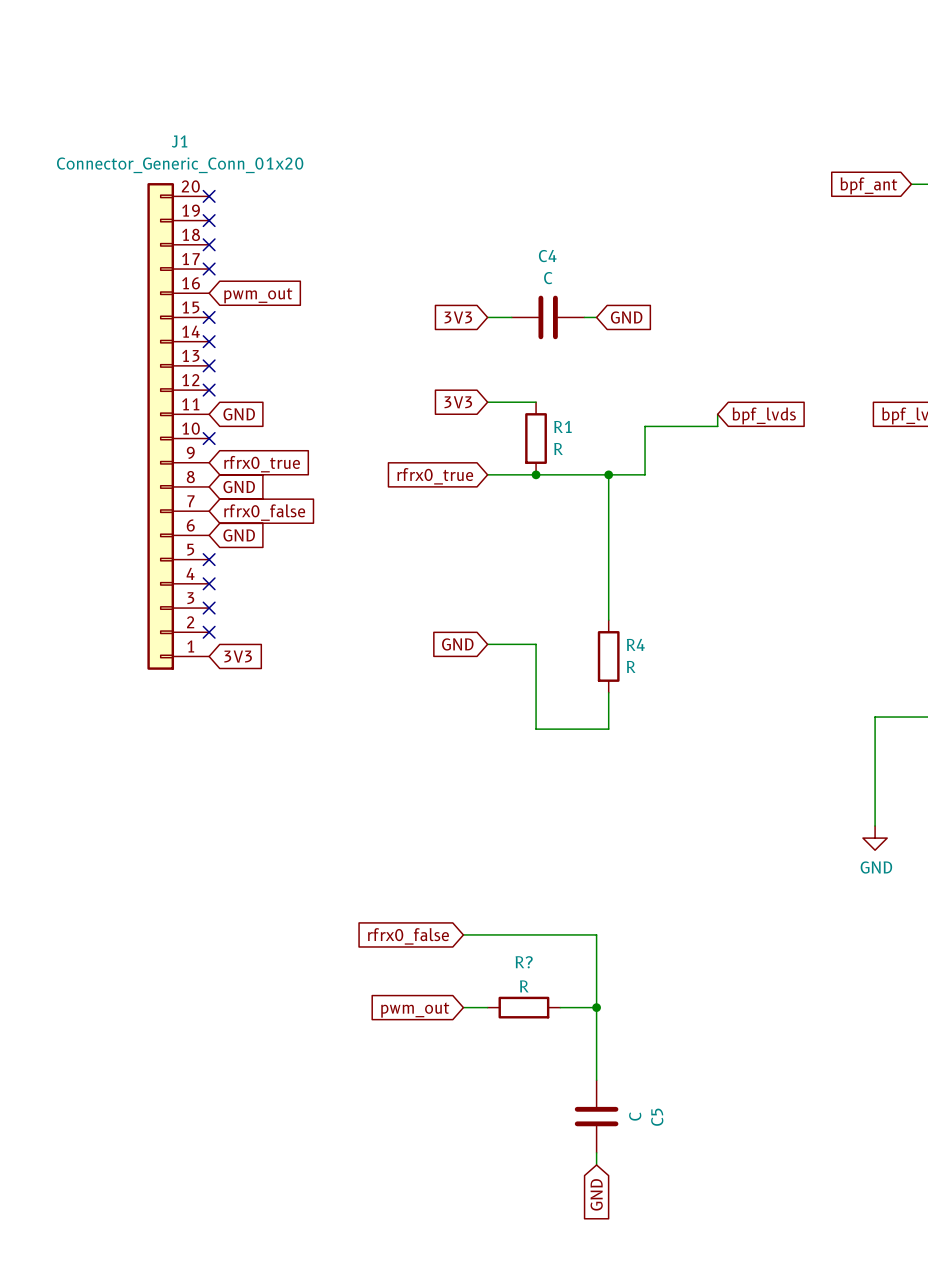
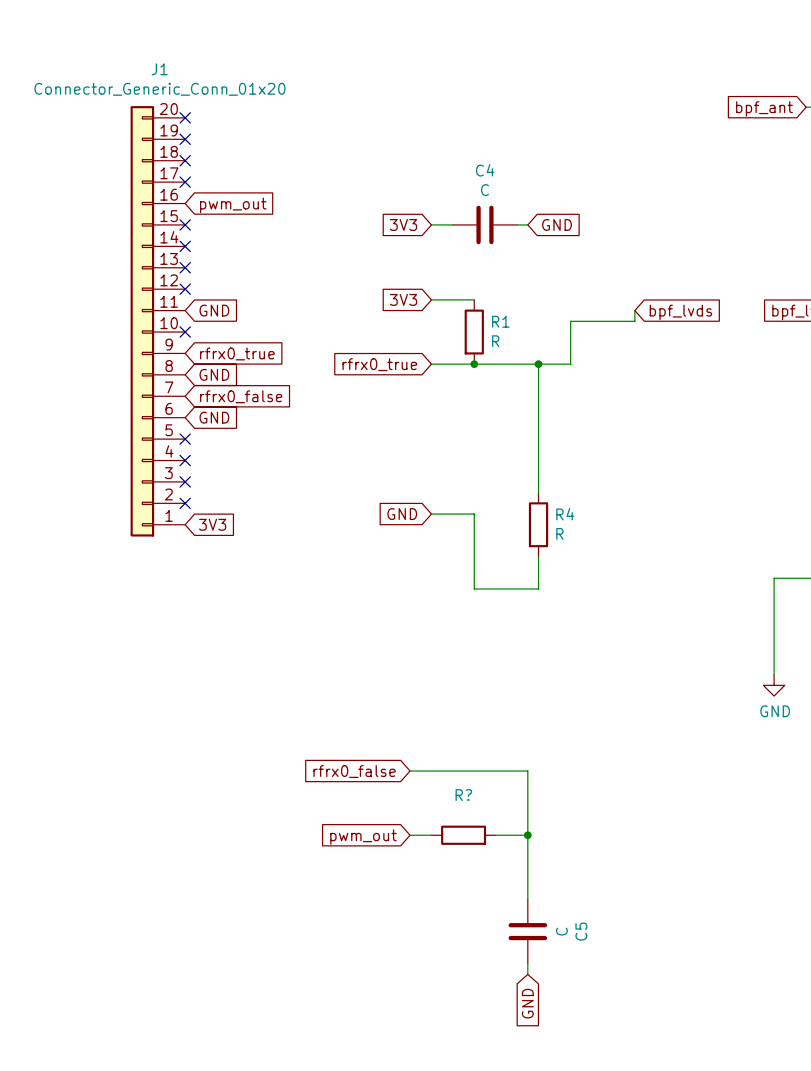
R? value: R (524, 986) -> none

